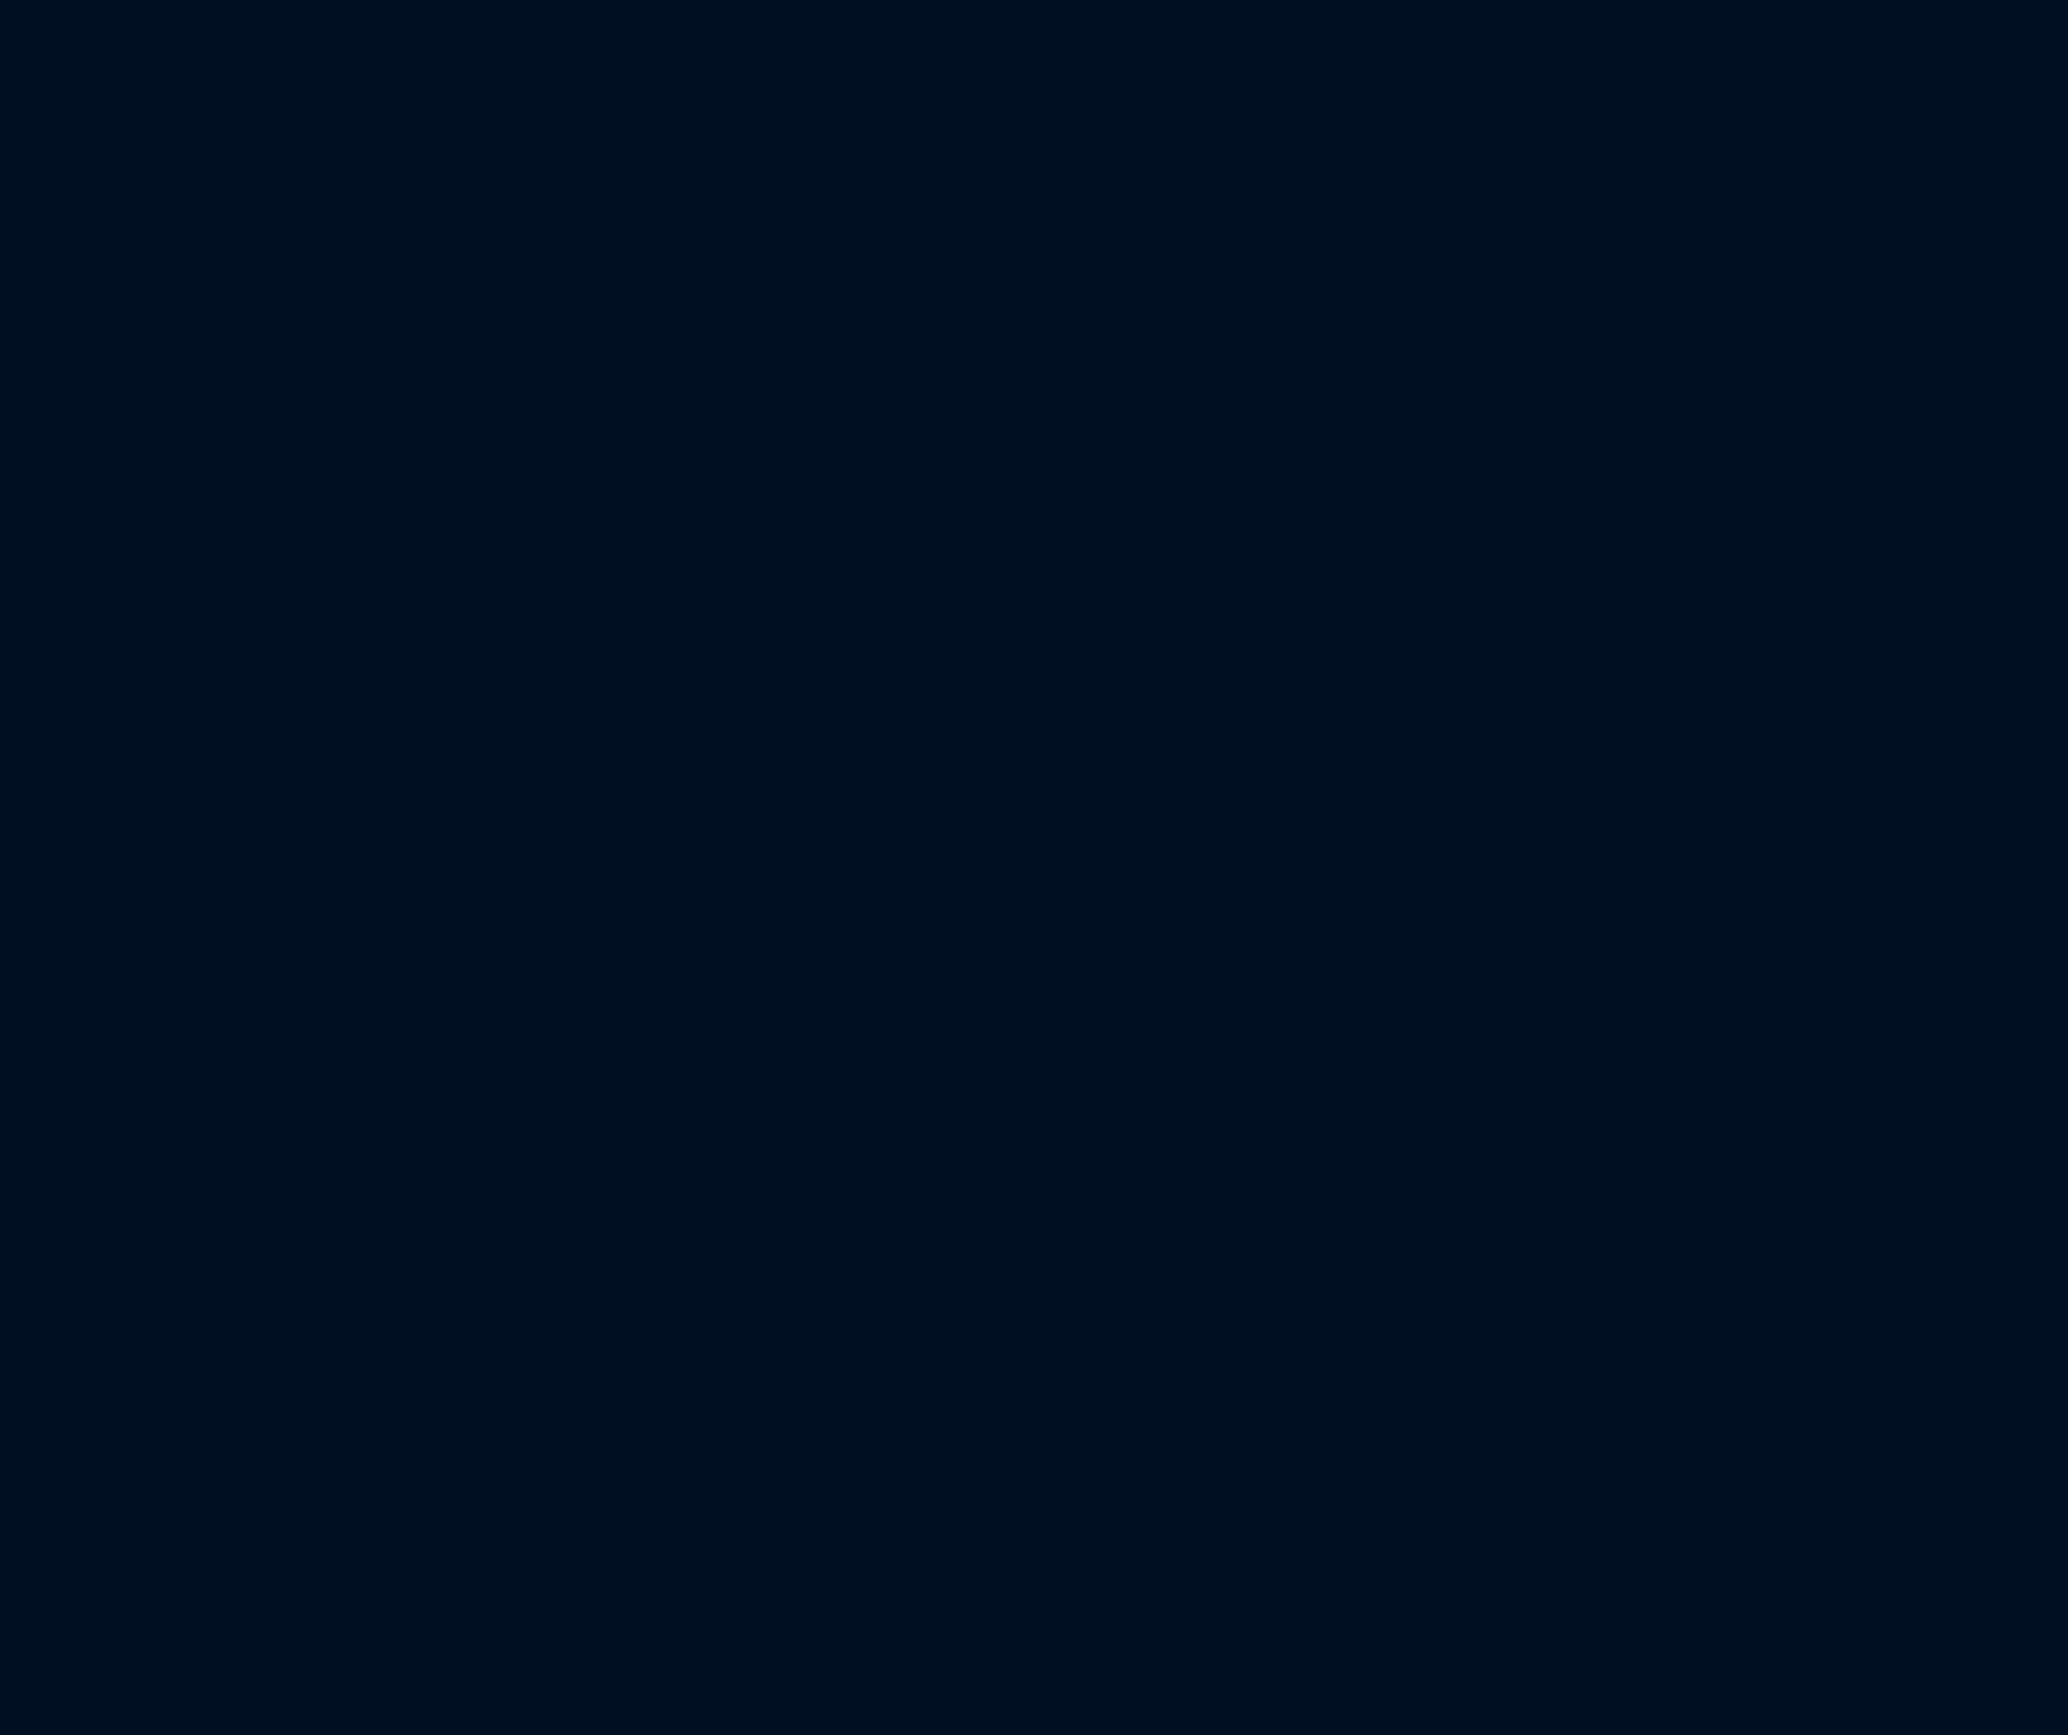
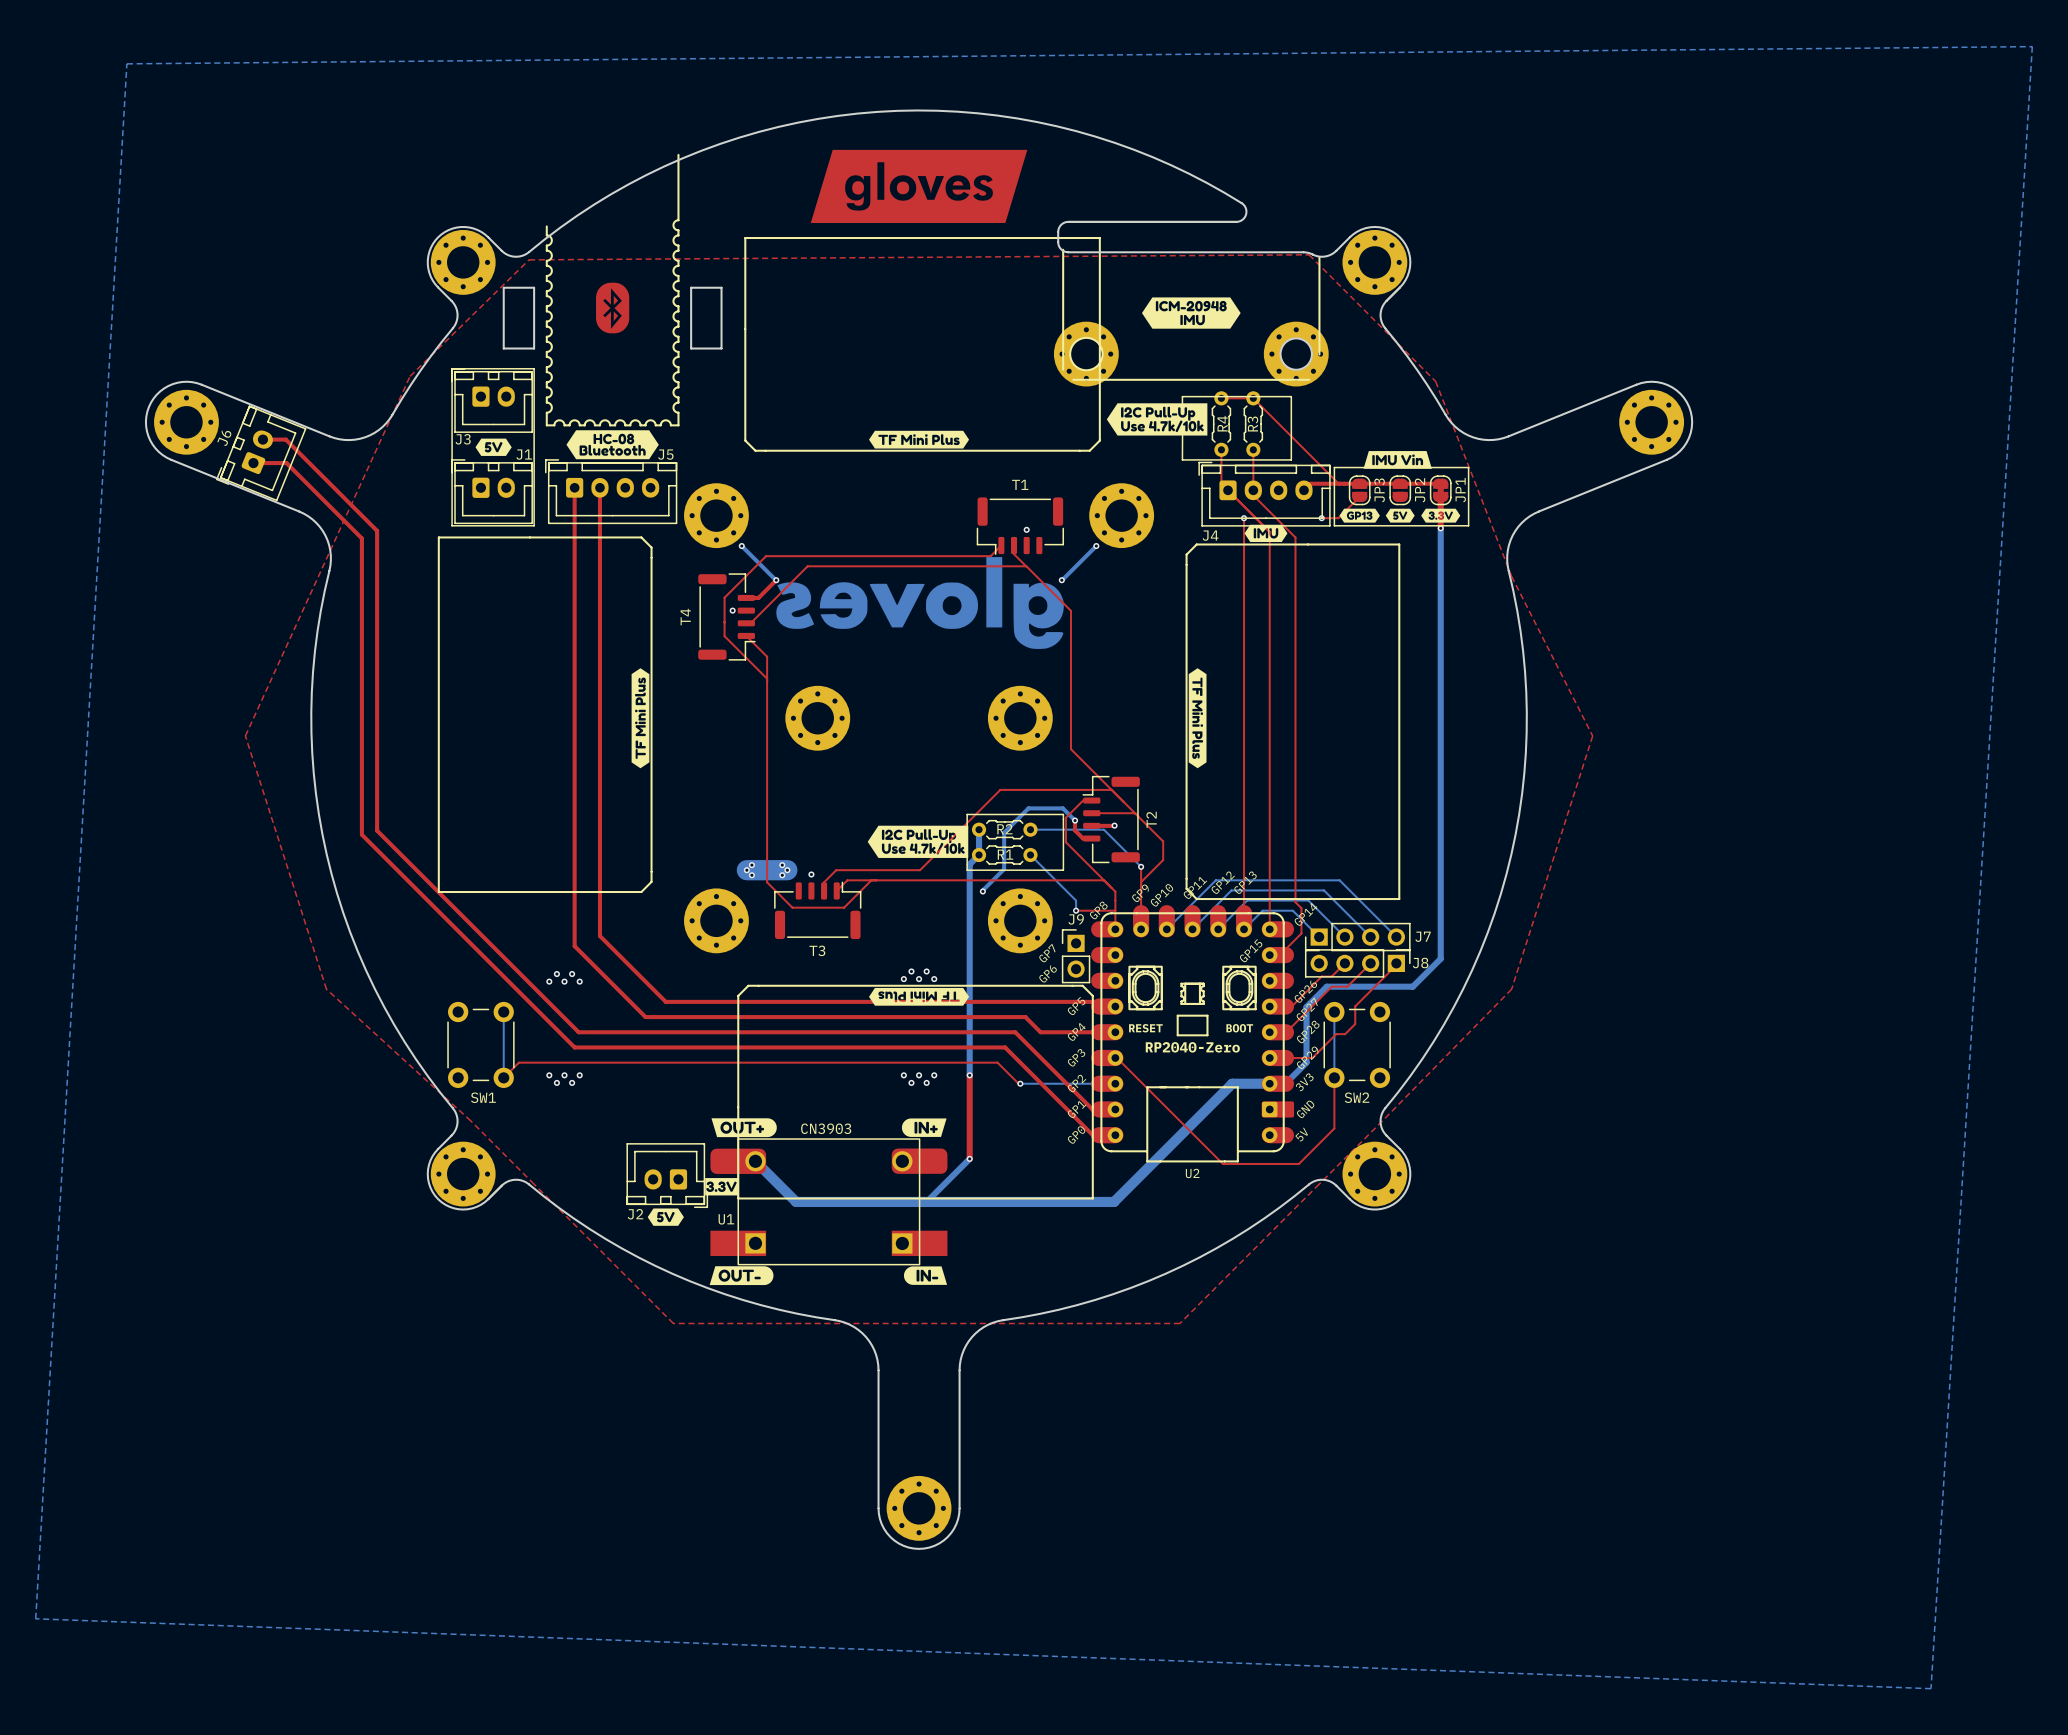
bottom zone outline: none -> (2032, 46) (126, 63) (35, 1618) (1931, 1688) (2032, 46)
drawing: none -> [810, 149, 1028, 224]
line: none -> (678, 154) (678, 220) (673, 225) (678, 230) (678, 235) (673, 240) (678, 245) (678, 250) (673, 255) (678, 260) (678, 265) (673, 270) (678, 275) (678, 281) (673, 286) (678, 291) (678, 296) (673, 301) (678, 306) (678, 311) (673, 316) (678, 321) (678, 326) (673, 331) (678, 336) (678, 341) (673, 346) (678, 351) (678, 357) (673, 362) (678, 367) (678, 372) (673, 377) (678, 382) (678, 387) (673, 392) (678, 397) (678, 402) (673, 407) (678, 412) (678, 425) (670, 425) (665, 420) (660, 425) (655, 425) (650, 420) (645, 425) (640, 425) (635, 420) (630, 425) (625, 425) (620, 420) (615, 425) (610, 425) (605, 420) (599, 425) (594, 425) (589, 420) (584, 425) (579, 425) (574, 420) (569, 425) (564, 425) (559, 420) (554, 425) (546, 425) (546, 412) (551, 407) (546, 402) (546, 397) (551, 392) (546, 387) (546, 382) (551, 377) (546, 372) (546, 367) (551, 362) (546, 356) (546, 351) (551, 346) (546, 341) (546, 336) (551, 331) (546, 326) (546, 321) (551, 316) (546, 311) (546, 306) (551, 301) (546, 296) (546, 291) (551, 286) (546, 280) (546, 275) (551, 270) (546, 265) (546, 260) (551, 255) (546, 250) (546, 245) (551, 240) (546, 235) (546, 226)
board edge: none -> (1241, 203) (1189, 173) (1133, 149) (1095, 136) (1037, 122) (977, 113) (917, 110) (857, 113) (797, 122) (720, 143) (646, 175) (593, 204) (522, 255) (512, 256) (505, 253) (485, 234) (473, 228) (456, 227) (441, 234) (435, 240) (429, 251) (428, 268) (435, 284) (454, 304) (457, 311) (456, 321) (420, 370) (389, 419) (382, 426) (369, 435) (349, 440) (334, 438) (192, 382) (177, 382) (164, 388) (153, 398) (147, 411) (146, 426) (148, 435) (155, 448) (162, 455) (303, 513) (316, 522) (327, 540) (330, 555) (330, 565) (317, 630) (311, 691) (312, 753) (318, 814) (337, 893) (365, 970) (404, 1042) (456, 1114) (457, 1124) (454, 1131) (435, 1152) (428, 1164) (428, 1183) (435, 1195) (449, 1206) (467, 1209) (484, 1202) (505, 1182) (512, 1180) (522, 1180) (605, 1239) (672, 1273) (743, 1299) (797, 1313) (839, 1321) (858, 1330) (872, 1345) (878, 1365) (879, 1518) (890, 1537) (908, 1547) (924, 1548) (939, 1543) (951, 1533) (958, 1518) (959, 1365) (966, 1345) (979, 1330) (998, 1321) (1040, 1313) (1095, 1299) (1165, 1273) (1232, 1239) (1315, 1180) (1322, 1179) (1332, 1182) (1353, 1202) (1368, 1208) (1381, 1208) (1389, 1206) (1402, 1195) (1409, 1180) (1408, 1163) (1402, 1152) (1383, 1131) (1380, 1122) (1381, 1114) (1433, 1042) (1472, 970) (1500, 893) (1519, 814) (1525, 753) (1526, 691) (1520, 630) (1507, 565) (1507, 555) (1510, 540) (1521, 522) (1534, 513) (1671, 457) (1683, 447) (1690, 433) (1691, 417) (1684, 397) (1667, 384) (1652, 381) (1636, 384) (1503, 438) (1483, 439) (1473, 437) (1459, 430) (1448, 419) (1417, 370) (1381, 321) (1382, 307) (1405, 280) (1410, 262) (1409, 253) (1403, 240) (1392, 231) (1384, 228) (1374, 226) (1361, 229) (1353, 234) (1334, 252) (1322, 256) (1303, 252) (1068, 252) (1062, 250) (1058, 244) (1058, 229) (1065, 222) (1237, 221) (1243, 218) (1246, 214) (1245, 208) (1241, 203)
line: none -> (745, 238) (1099, 238) (1099, 440) (1089, 450) (755, 450) (745, 440) (745, 238)
line: none -> (1063, 249) (1063, 369)
top zone outline: none -> (1309, 254) (529, 259) (410, 376) (245, 735) (326, 989) (470, 1120) (673, 1323) (1179, 1323) (1511, 989) (1592, 735) (1511, 576) (1435, 381) (1309, 254)
line: none -> (1319, 257) (1319, 354)
part: none -> (463, 262)
part: none -> (1374, 262)
drawing: none -> [596, 282, 630, 334]
board edge: none -> (503, 287) (534, 287) (534, 348) (503, 348) (503, 287)
board edge: none -> (691, 287) (691, 348) (721, 348) (721, 287) (691, 287)
drawing: none -> [1141, 297, 1241, 329]
drawing: none -> [1069, 336, 1104, 372]
round board edge: none -> [1279, 337, 1313, 371]
part: none -> (1086, 354)
part: none -> (1296, 354)
line: none -> (452, 368) (534, 368) (534, 525) (452, 525) (452, 368)
line: none -> (1073, 379) (1309, 379)
top track: none -> (1221, 398) (1253, 398) (1338, 483) (1344, 483)
J3: none -> (492, 400)
drawing: none -> [1106, 403, 1208, 436]
line: none -> (1182, 404) (1182, 396) (1291, 396) (1291, 459) (1182, 459) (1182, 435)
part: none -> (186, 422)
part: none -> (1651, 422)
R4: none -> (1221, 424)
R3: none -> (1253, 424)
drawing: none -> [566, 430, 659, 460]
drawing: none -> [869, 430, 970, 449]
drawing: none -> [475, 438, 512, 456]
top track: none -> (262, 439) (285, 439) (377, 530) (377, 830) (578, 1032) (1015, 1032) (1092, 1109) (1115, 1109)
top track: none -> (1221, 449) (1221, 483) (1269, 532) (1269, 929)
top track: none -> (1253, 449) (1253, 495) (1295, 537) (1295, 902) (1301, 908) (1301, 933) (1279, 955) (1269, 955)
drawing: none -> [1363, 451, 1432, 469]
J6: none -> (261, 453)
top track: none -> (253, 463) (286, 463) (361, 538) (361, 834) (574, 1047) (1005, 1047) (1092, 1135) (1115, 1135)
line: none -> (1334, 467) (1468, 467) (1468, 525) (1334, 525) (1334, 467)
top track: none -> (1440, 483) (1310, 483) (1303, 490)
top track: none -> (574, 487) (574, 946) (645, 1017) (1025, 1017) (1040, 1032) (1115, 1032)
top track: none -> (599, 487) (599, 936) (665, 1001) (1110, 1001) (1115, 1006)
JP3: none -> (1359, 490)
JP2: none -> (1400, 490)
JP1: none -> (1440, 490)
J1: none -> (492, 491)
J5: none -> (611, 491)
J4: none -> (1264, 494)
top track: none -> (1359, 496) (1338, 518) (1321, 518)
top track: none -> (1440, 496) (1440, 528)
drawing: none -> [1339, 508, 1461, 523]
part: none -> (716, 515)
part: none -> (1121, 515)
top track: none -> (1244, 518) (1244, 929)
via: none -> (1244, 518)
via: none -> (1321, 518)
drawing: none -> [1244, 524, 1288, 543]
T1: none -> (1020, 526)
bottom track: none -> (1440, 528) (1440, 958) (1412, 986) (1326, 986) (1306, 1006) (1306, 1062) (1285, 1083) (1232, 1083) (1114, 1201) (796, 1201) (755, 1161)
via: none -> (1440, 528)
via: none -> (1026, 529)
line: none -> (438, 537) (641, 537) (651, 547) (651, 881) (641, 892) (438, 892) (438, 537)
line: none -> (1196, 544) (1186, 554) (1186, 888) (1196, 899) (1399, 899) (1399, 544) (1196, 544)
top track: none -> (1001, 545) (990, 556) (766, 556) (724, 597) (724, 636) (767, 678)
top track: none -> (1014, 545) (1014, 554) (1026, 566)
bottom track: none -> (741, 546) (776, 580)
via: none -> (741, 546)
bottom track: none -> (1096, 546) (1061, 580)
via: none -> (1096, 546)
drawing: none -> [776, 557, 1064, 649]
top track: none -> (776, 580) (758, 597) (746, 597)
via: none -> (776, 580)
via: none -> (1061, 580)
via: none -> (732, 610)
T4: none -> (726, 616)
top track: none -> (746, 623) (750, 623) (807, 566) (1026, 566) (1071, 610) (1071, 749) (1163, 841) (1163, 860) (1141, 882)
top track: none -> (746, 635) (767, 656) (767, 882) (792, 907) (844, 907) (871, 880)
drawing: none -> [631, 668, 650, 769]
drawing: none -> [1188, 668, 1207, 769]
part: none -> (817, 718)
part: none -> (1020, 718)
top track: none -> (1111, 789) (1000, 789) (920, 870) (836, 870) (824, 882) (824, 890)
top track: none -> (1091, 800) (1083, 800) (1065, 817) (1065, 842) (1115, 891) (1115, 929)
top track: none -> (1091, 813) (1134, 813)
line: none -> (967, 814) (1063, 814) (1063, 870) (967, 870) (967, 814)
T2: none -> (1111, 819)
top track: none -> (1075, 820) (1075, 830) (1083, 838) (1091, 838)
bottom track: none -> (1075, 820) (1062, 808) (1028, 808) (1004, 832) (1004, 869) (982, 891)
via: none -> (1075, 820)
drawing: none -> [867, 825, 969, 858]
top track: none -> (1114, 825) (1091, 825)
via: none -> (1114, 825)
bottom track: none -> (979, 829) (979, 855) (969, 864) (969, 1075)
R2: none -> (1004, 829)
bottom track: none -> (1030, 829) (1103, 829) (1141, 866)
R1: none -> (1004, 855)
bottom track: none -> (1030, 855) (1076, 900) (1076, 910)
via: none -> (751, 865)
via: none -> (782, 865)
top track: none -> (1141, 866) (1141, 929)
via: none -> (1141, 866)
bottom track: none -> (746, 870) (787, 870)
via: none -> (746, 870)
via: none -> (787, 870)
via: none -> (811, 874)
via: none -> (751, 875)
via: none -> (782, 875)
top track: none -> (1104, 880) (847, 880) (836, 890)
via: none -> (982, 891)
T3: none -> (817, 910)
top track: none -> (1076, 910) (1115, 910)
via: none -> (1076, 910)
part: none -> (716, 920)
part: none -> (1020, 920)
bottom track: none -> (1166, 929) (1215, 880) (1339, 880) (1396, 937)
bottom track: none -> (1192, 929) (1231, 890) (1324, 890) (1370, 937)
bottom track: none -> (1218, 929) (1247, 900) (1308, 900) (1344, 937)
bottom track: none -> (1244, 929) (1262, 910) (1292, 910) (1319, 937)
J7: none -> (1357, 937)
J9: none -> (1076, 956)
top track: none -> (1344, 963) (1331, 976) (1321, 976) (1291, 1006) (1269, 1006)
J8: none -> (1357, 963)
top track: none -> (1370, 963) (1347, 986) (1331, 986) (1286, 1032) (1269, 1032)
top track: none -> (1396, 963) (1355, 1006) (1355, 1024) (1345, 1034) (1336, 1034) (1312, 1058) (1269, 1058)
via: none -> (911, 971)
via: none -> (926, 971)
via: none -> (556, 974)
via: none -> (572, 974)
via: none -> (903, 979)
via: none -> (919, 979)
via: none -> (934, 979)
via: none -> (549, 981)
via: none -> (564, 981)
via: none -> (579, 981)
line: none -> (748, 985) (738, 995) (738, 1198) (1092, 1198) (1092, 995) (1082, 985) (748, 985)
drawing: none -> [869, 987, 970, 1006]
bottom track: none -> (503, 1012) (503, 1077) (509, 1083)
bottom track: none -> (1334, 1012) (1334, 1077)
U2: none -> (1192, 1033)
SW1: none -> (480, 1044)
SW2: none -> (1357, 1044)
top track: none -> (1115, 1058) (1222, 1163) (1298, 1163) (1334, 1128) (1334, 1077)
via: none -> (549, 1075)
via: none -> (564, 1075)
via: none -> (579, 1075)
via: none -> (903, 1075)
via: none -> (919, 1075)
via: none -> (934, 1075)
top track: none -> (969, 1075) (969, 1158)
via: none -> (969, 1075)
top track: none -> (503, 1077) (518, 1062) (997, 1062) (1020, 1083)
via: none -> (556, 1082)
via: none -> (572, 1082)
via: none -> (911, 1082)
via: none -> (926, 1082)
bottom track: none -> (1020, 1083) (1115, 1083)
via: none -> (1020, 1083)
bottom track: none -> (969, 1158) (926, 1201) (924, 1201)
via: none -> (969, 1158)
part: none -> (463, 1174)
part: none -> (1374, 1174)
J2: none -> (667, 1175)
drawing: none -> [705, 1178, 738, 1196]
U1: none -> (828, 1201)
drawing: none -> [647, 1208, 684, 1226]
part: none -> (919, 1508)

